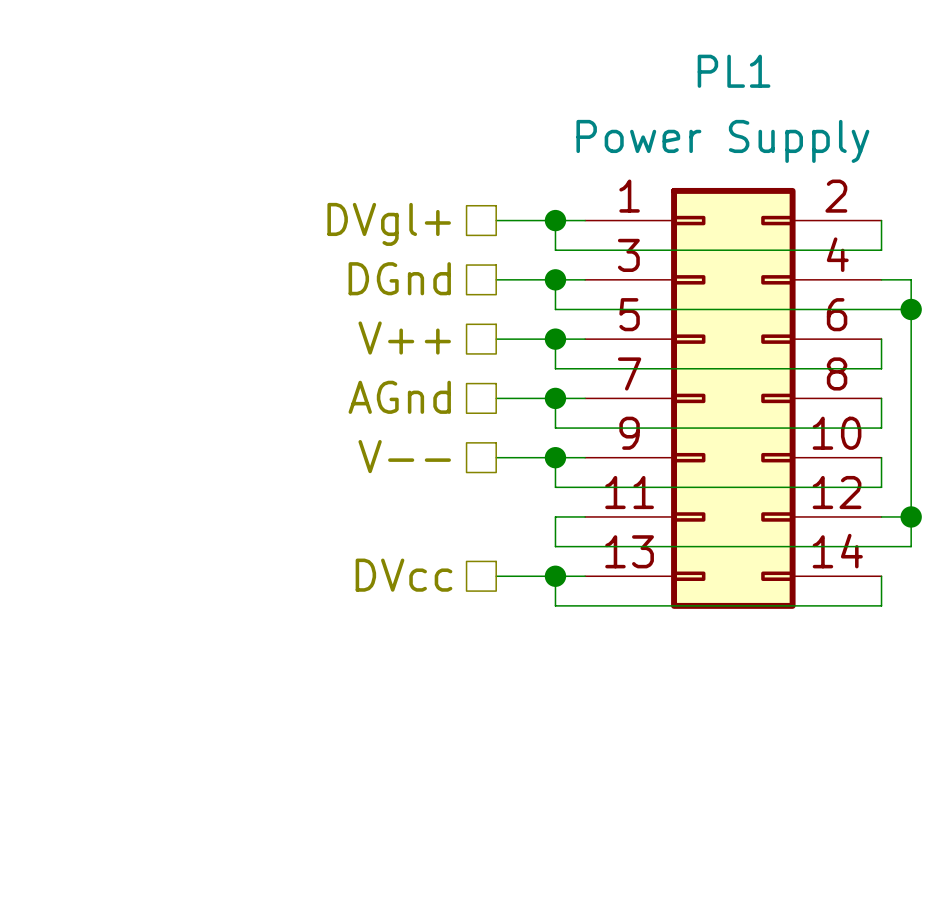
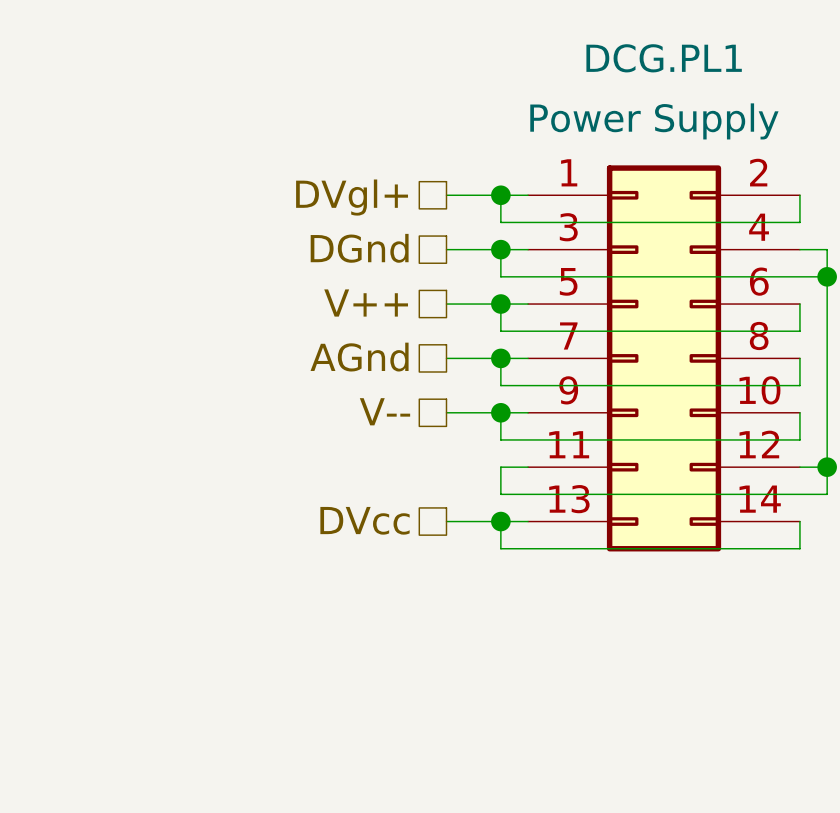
PL1 name: PL1 (734, 71) -> DCG.PL1 (664, 58)

